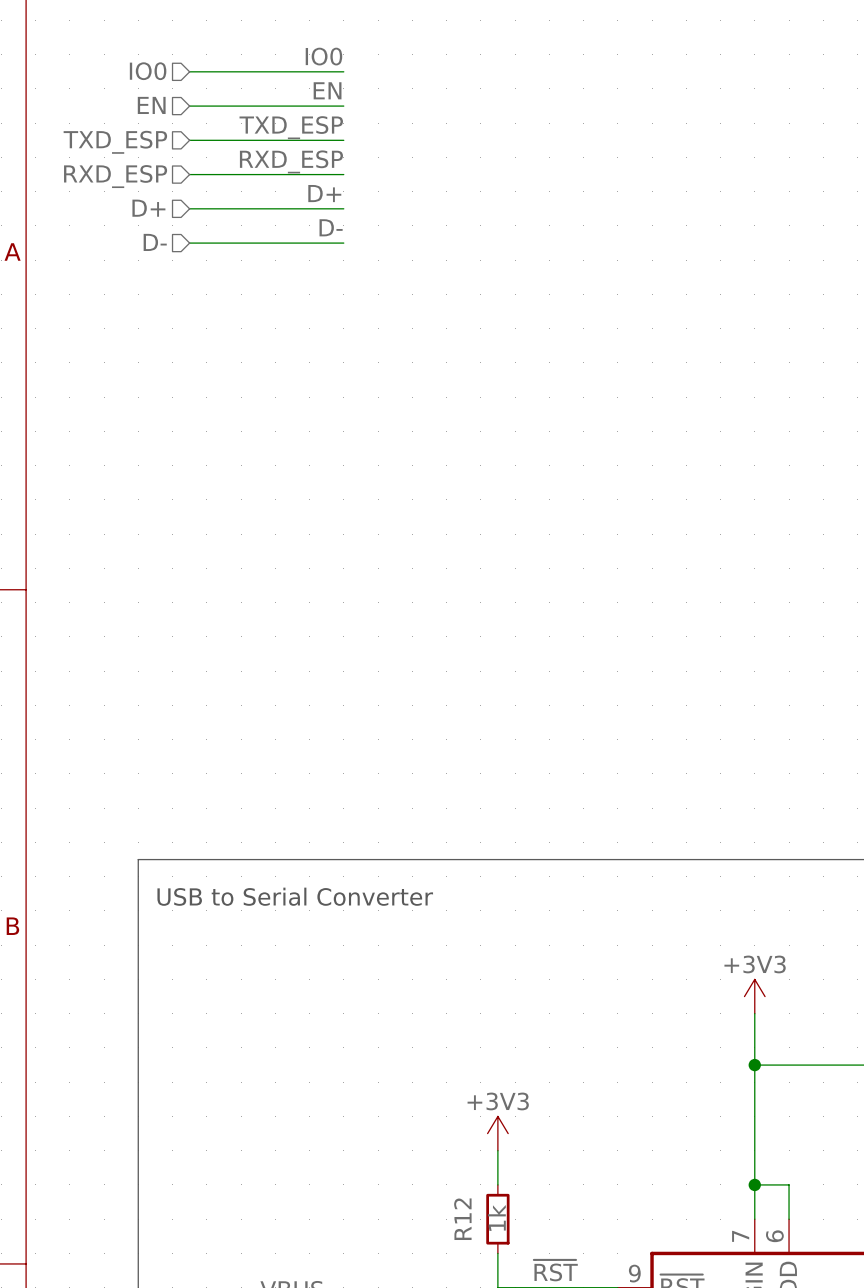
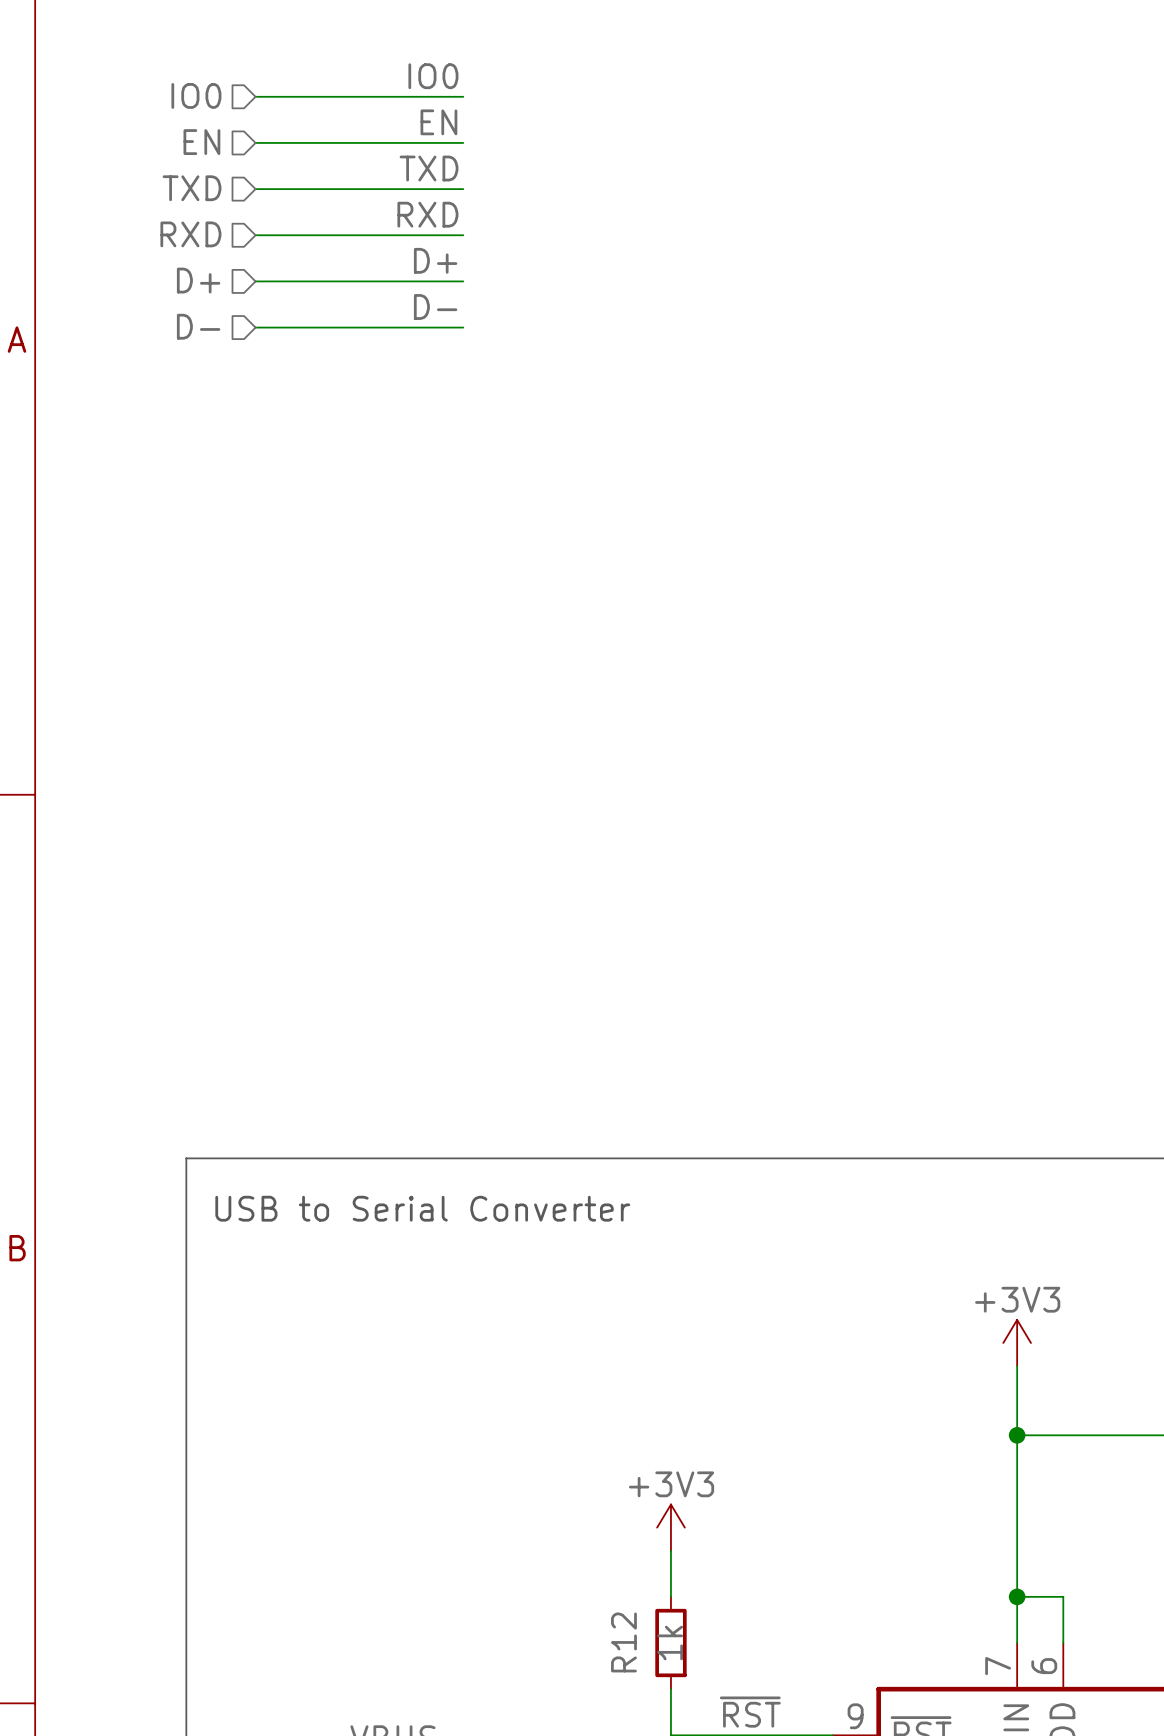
label: TXD_ESP (291, 127) -> TXD (429, 168)
hierarchical label: TXD_ESP (115, 142) -> TXD (192, 188)
label: RXD_ESP (291, 161) -> RXD (427, 214)
hierarchical label: RXD_ESP (115, 176) -> RXD (190, 234)

